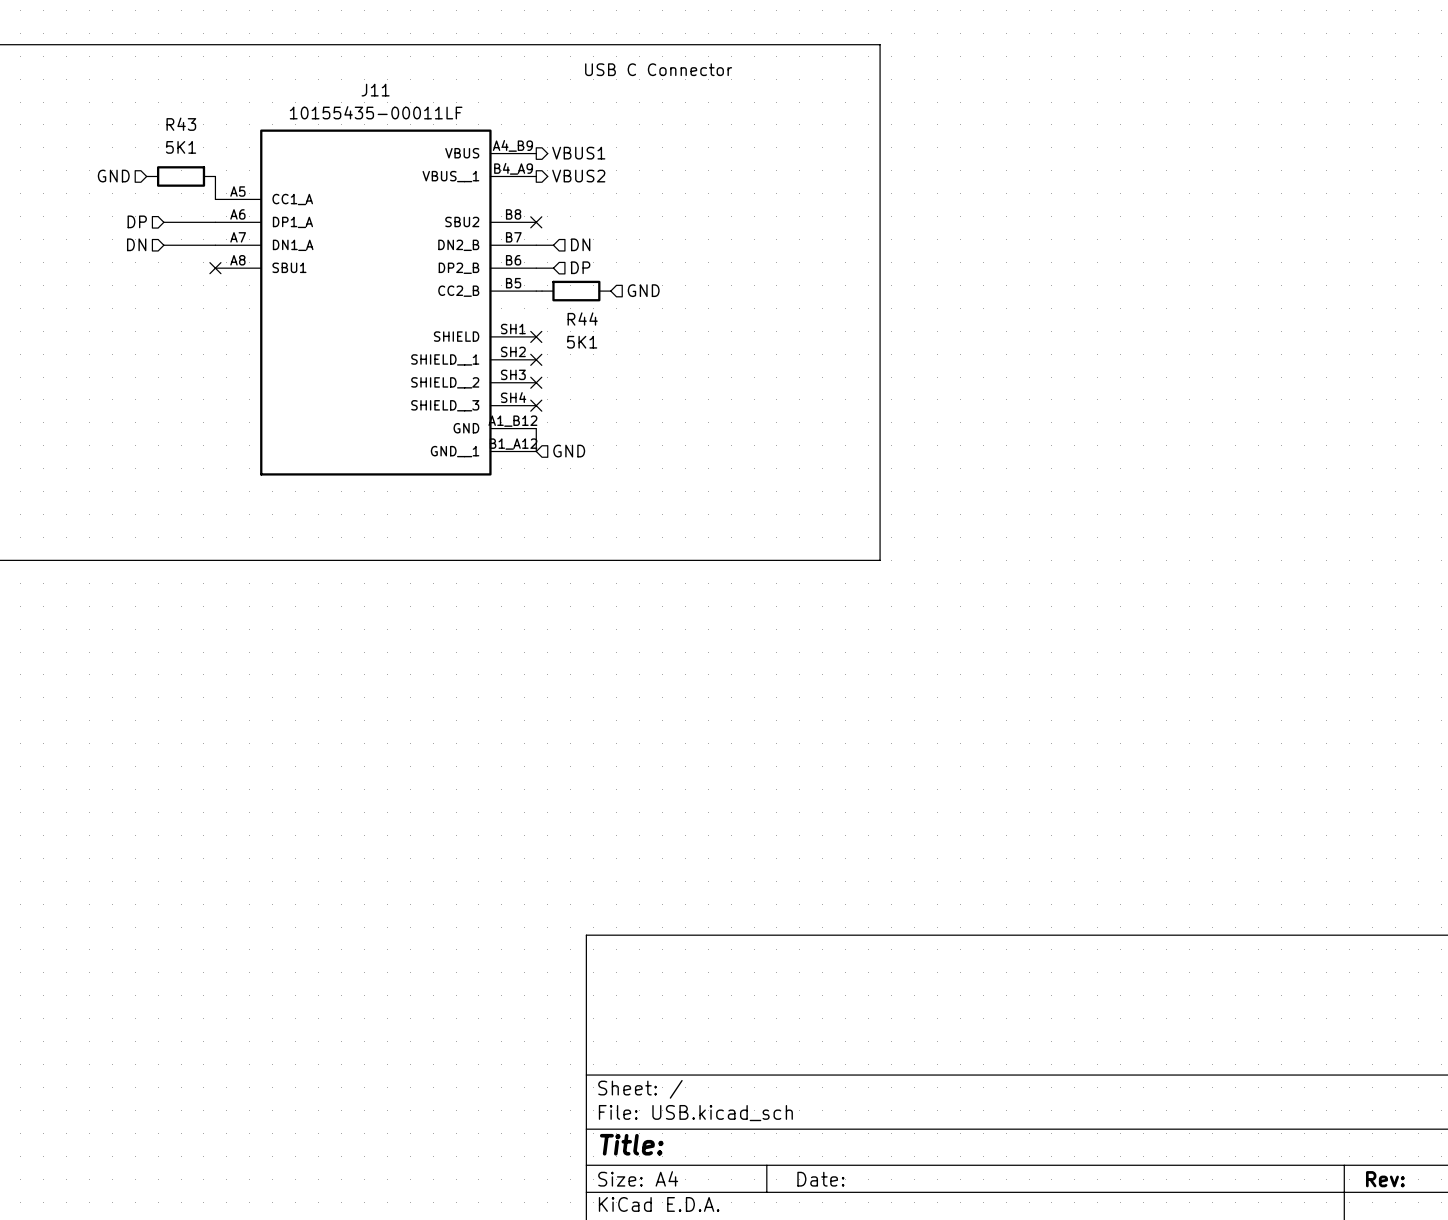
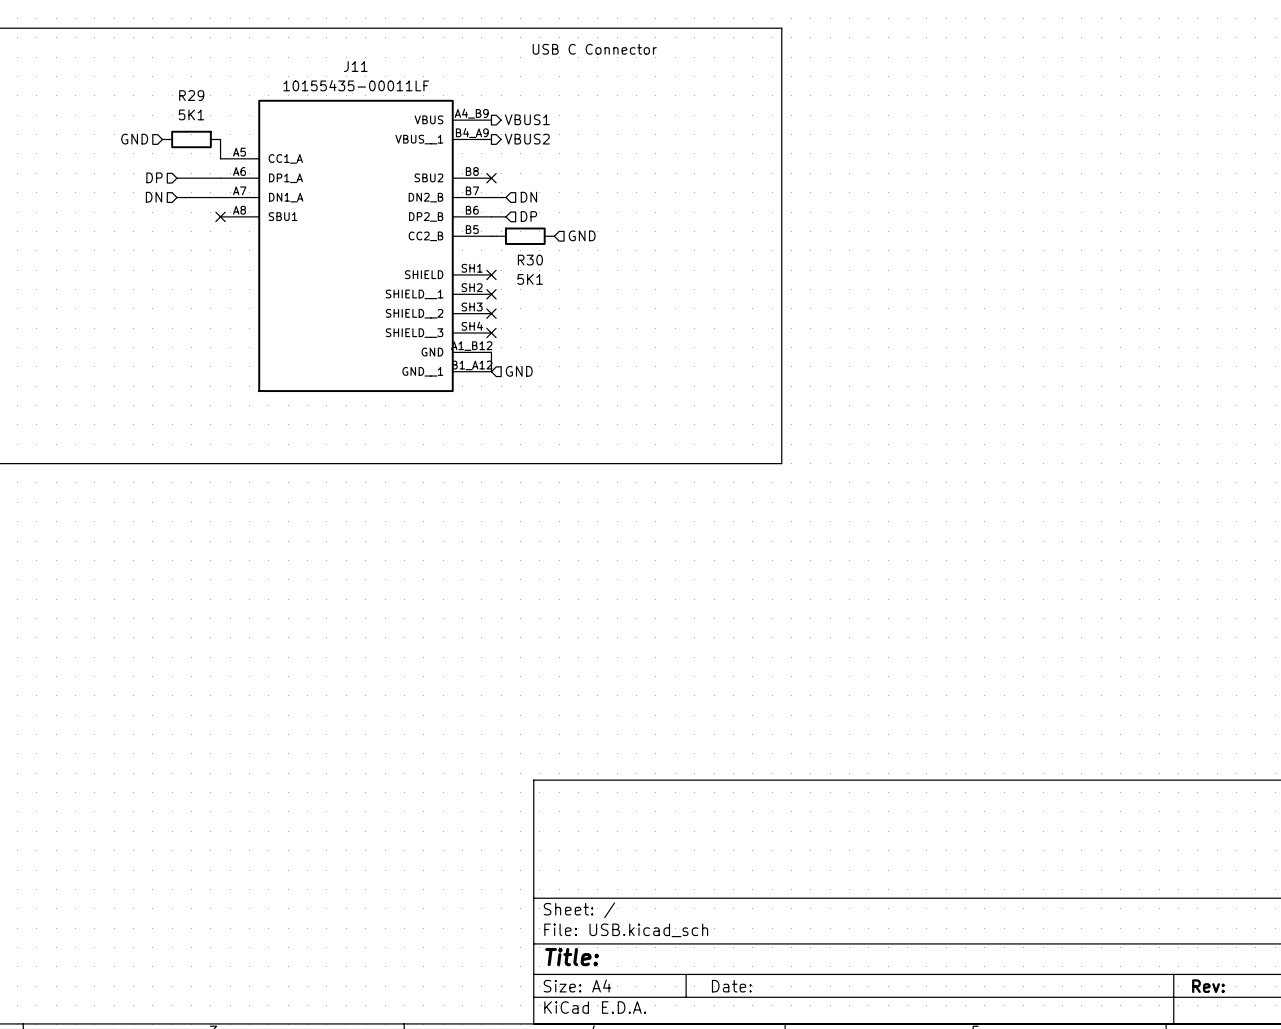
R43 name: R43 (181, 124) -> R29 (191, 95)
R44 name: R44 (582, 319) -> R30 (530, 260)

